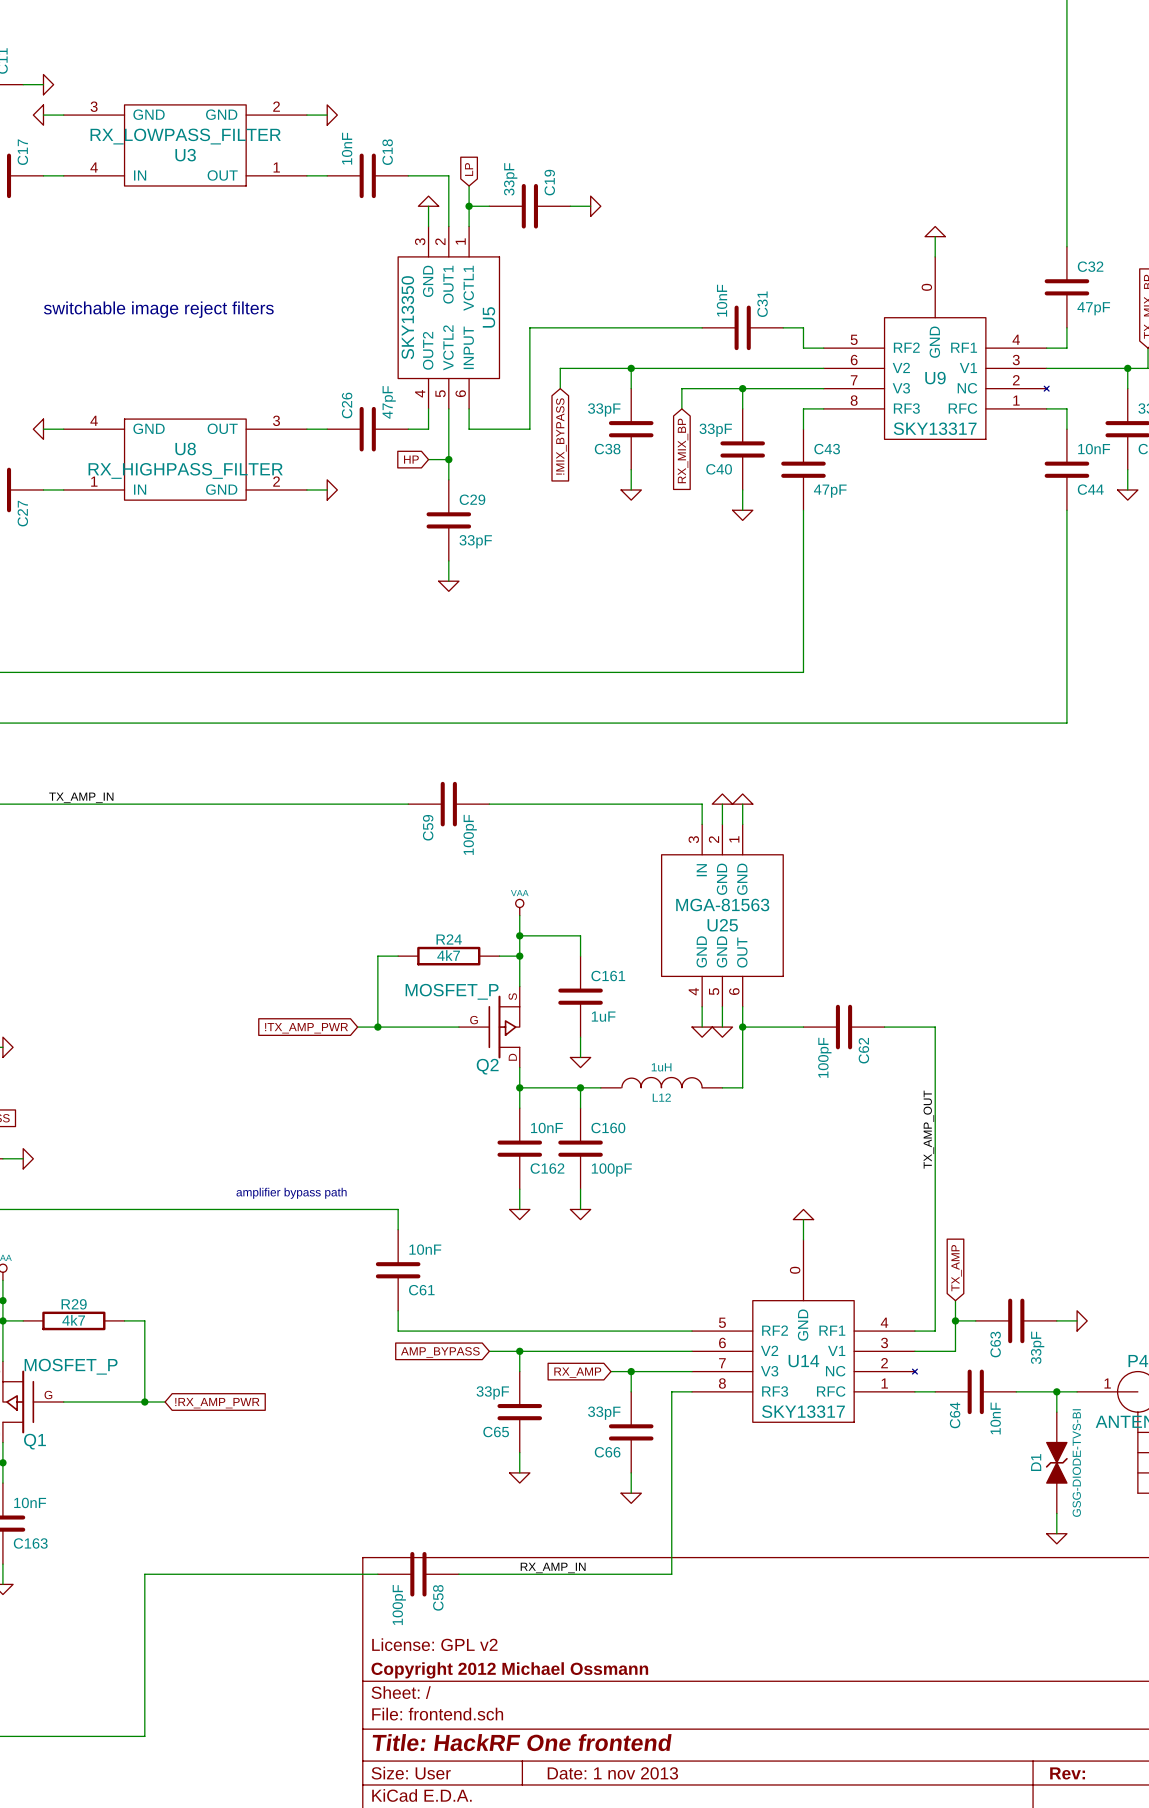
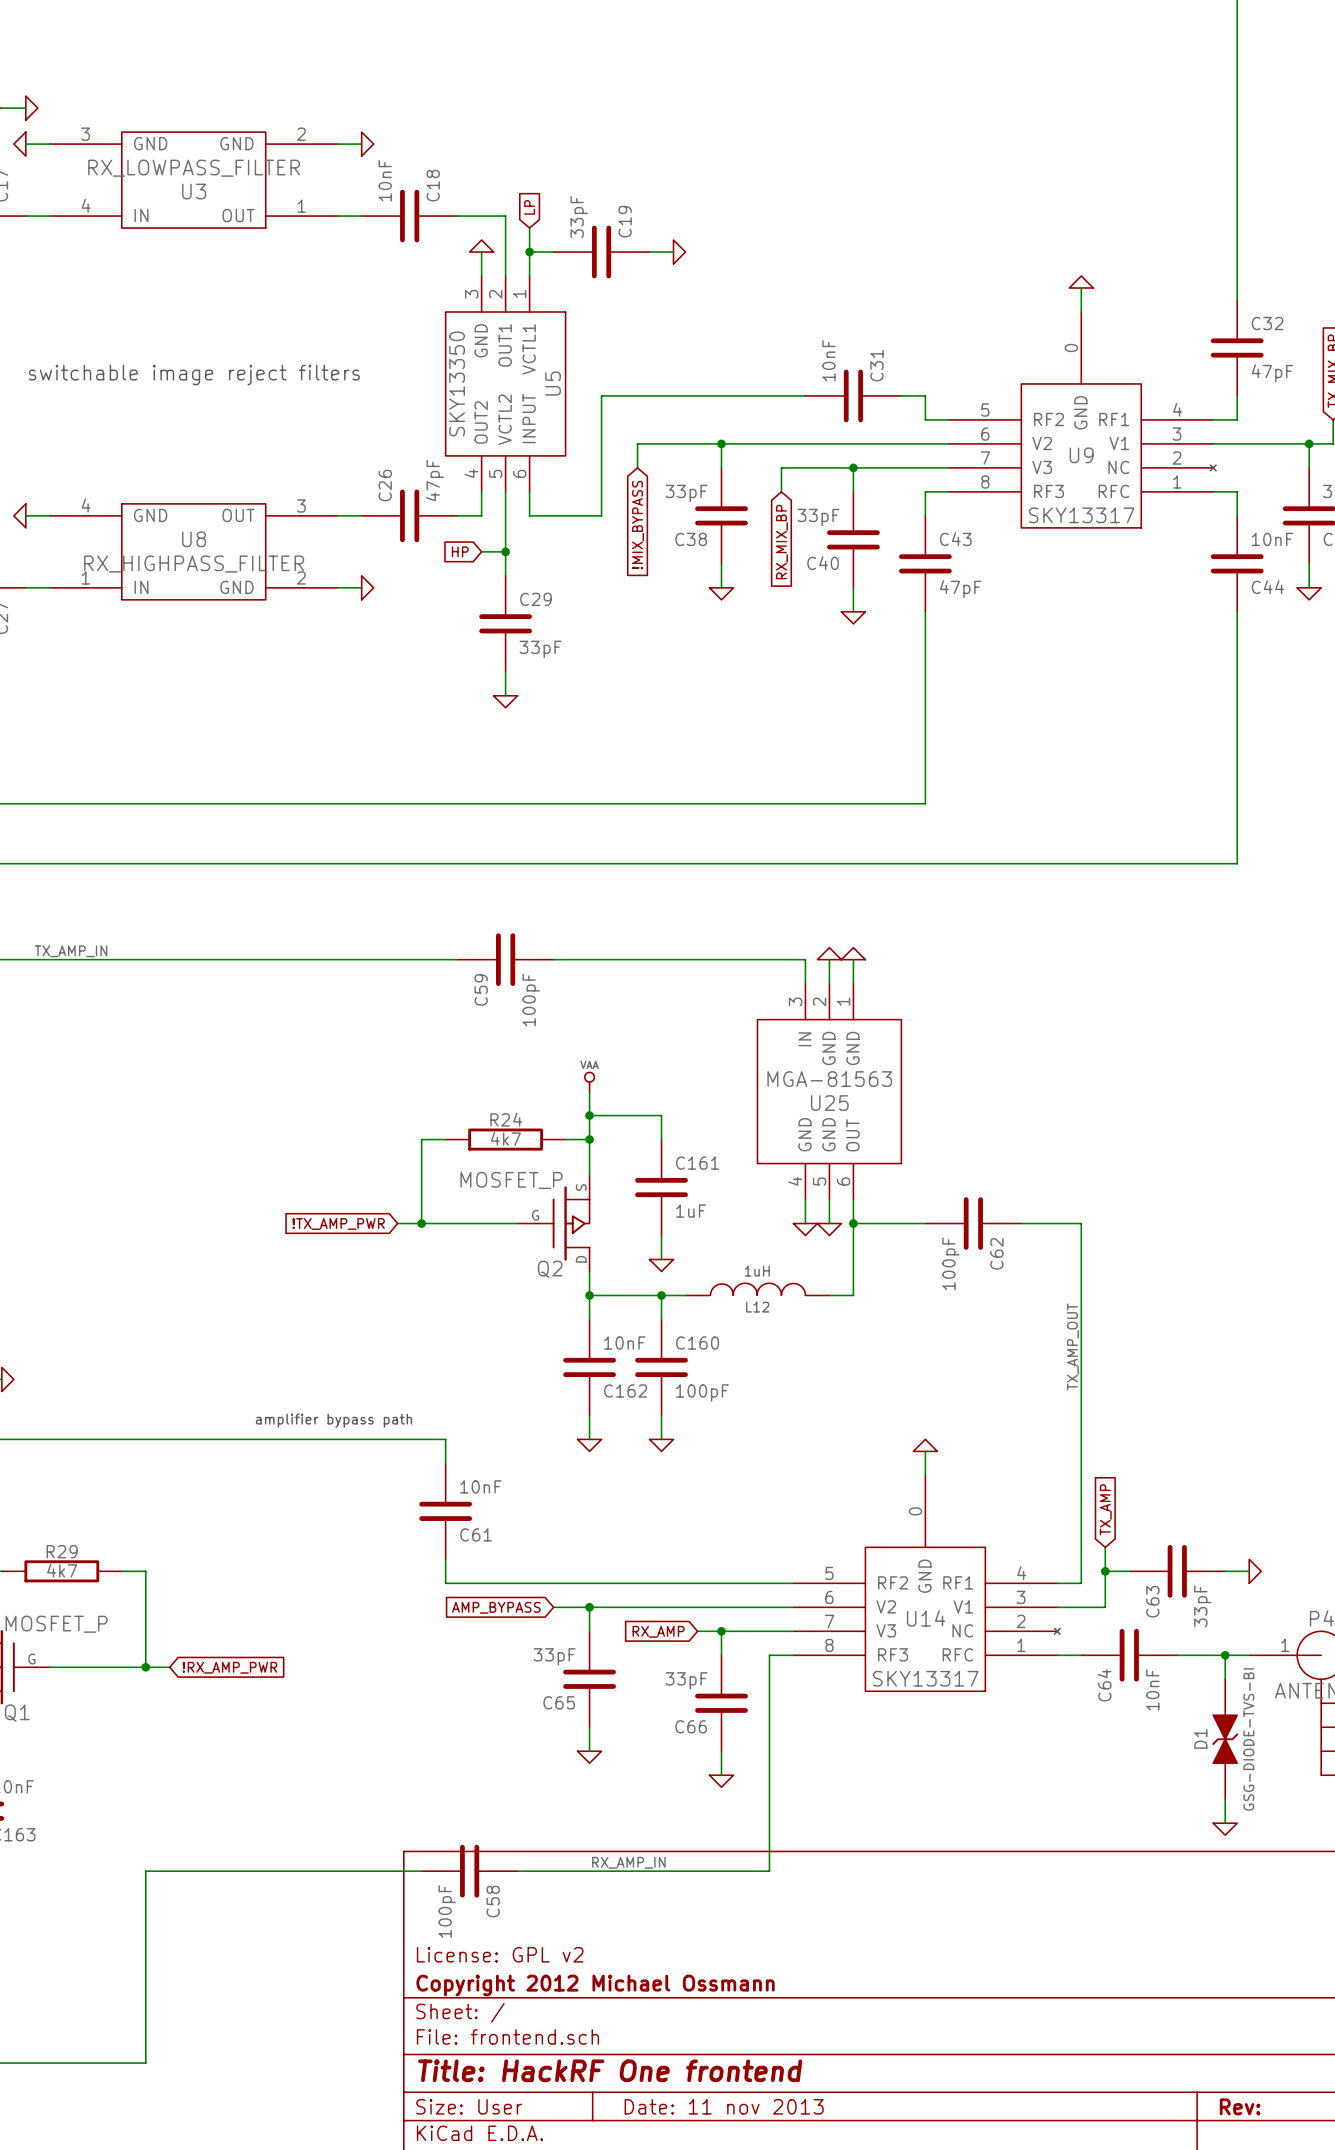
title block: Date: 1 nov 2013 (612, 1773) -> Date: 11 nov 2013 (724, 2106)

